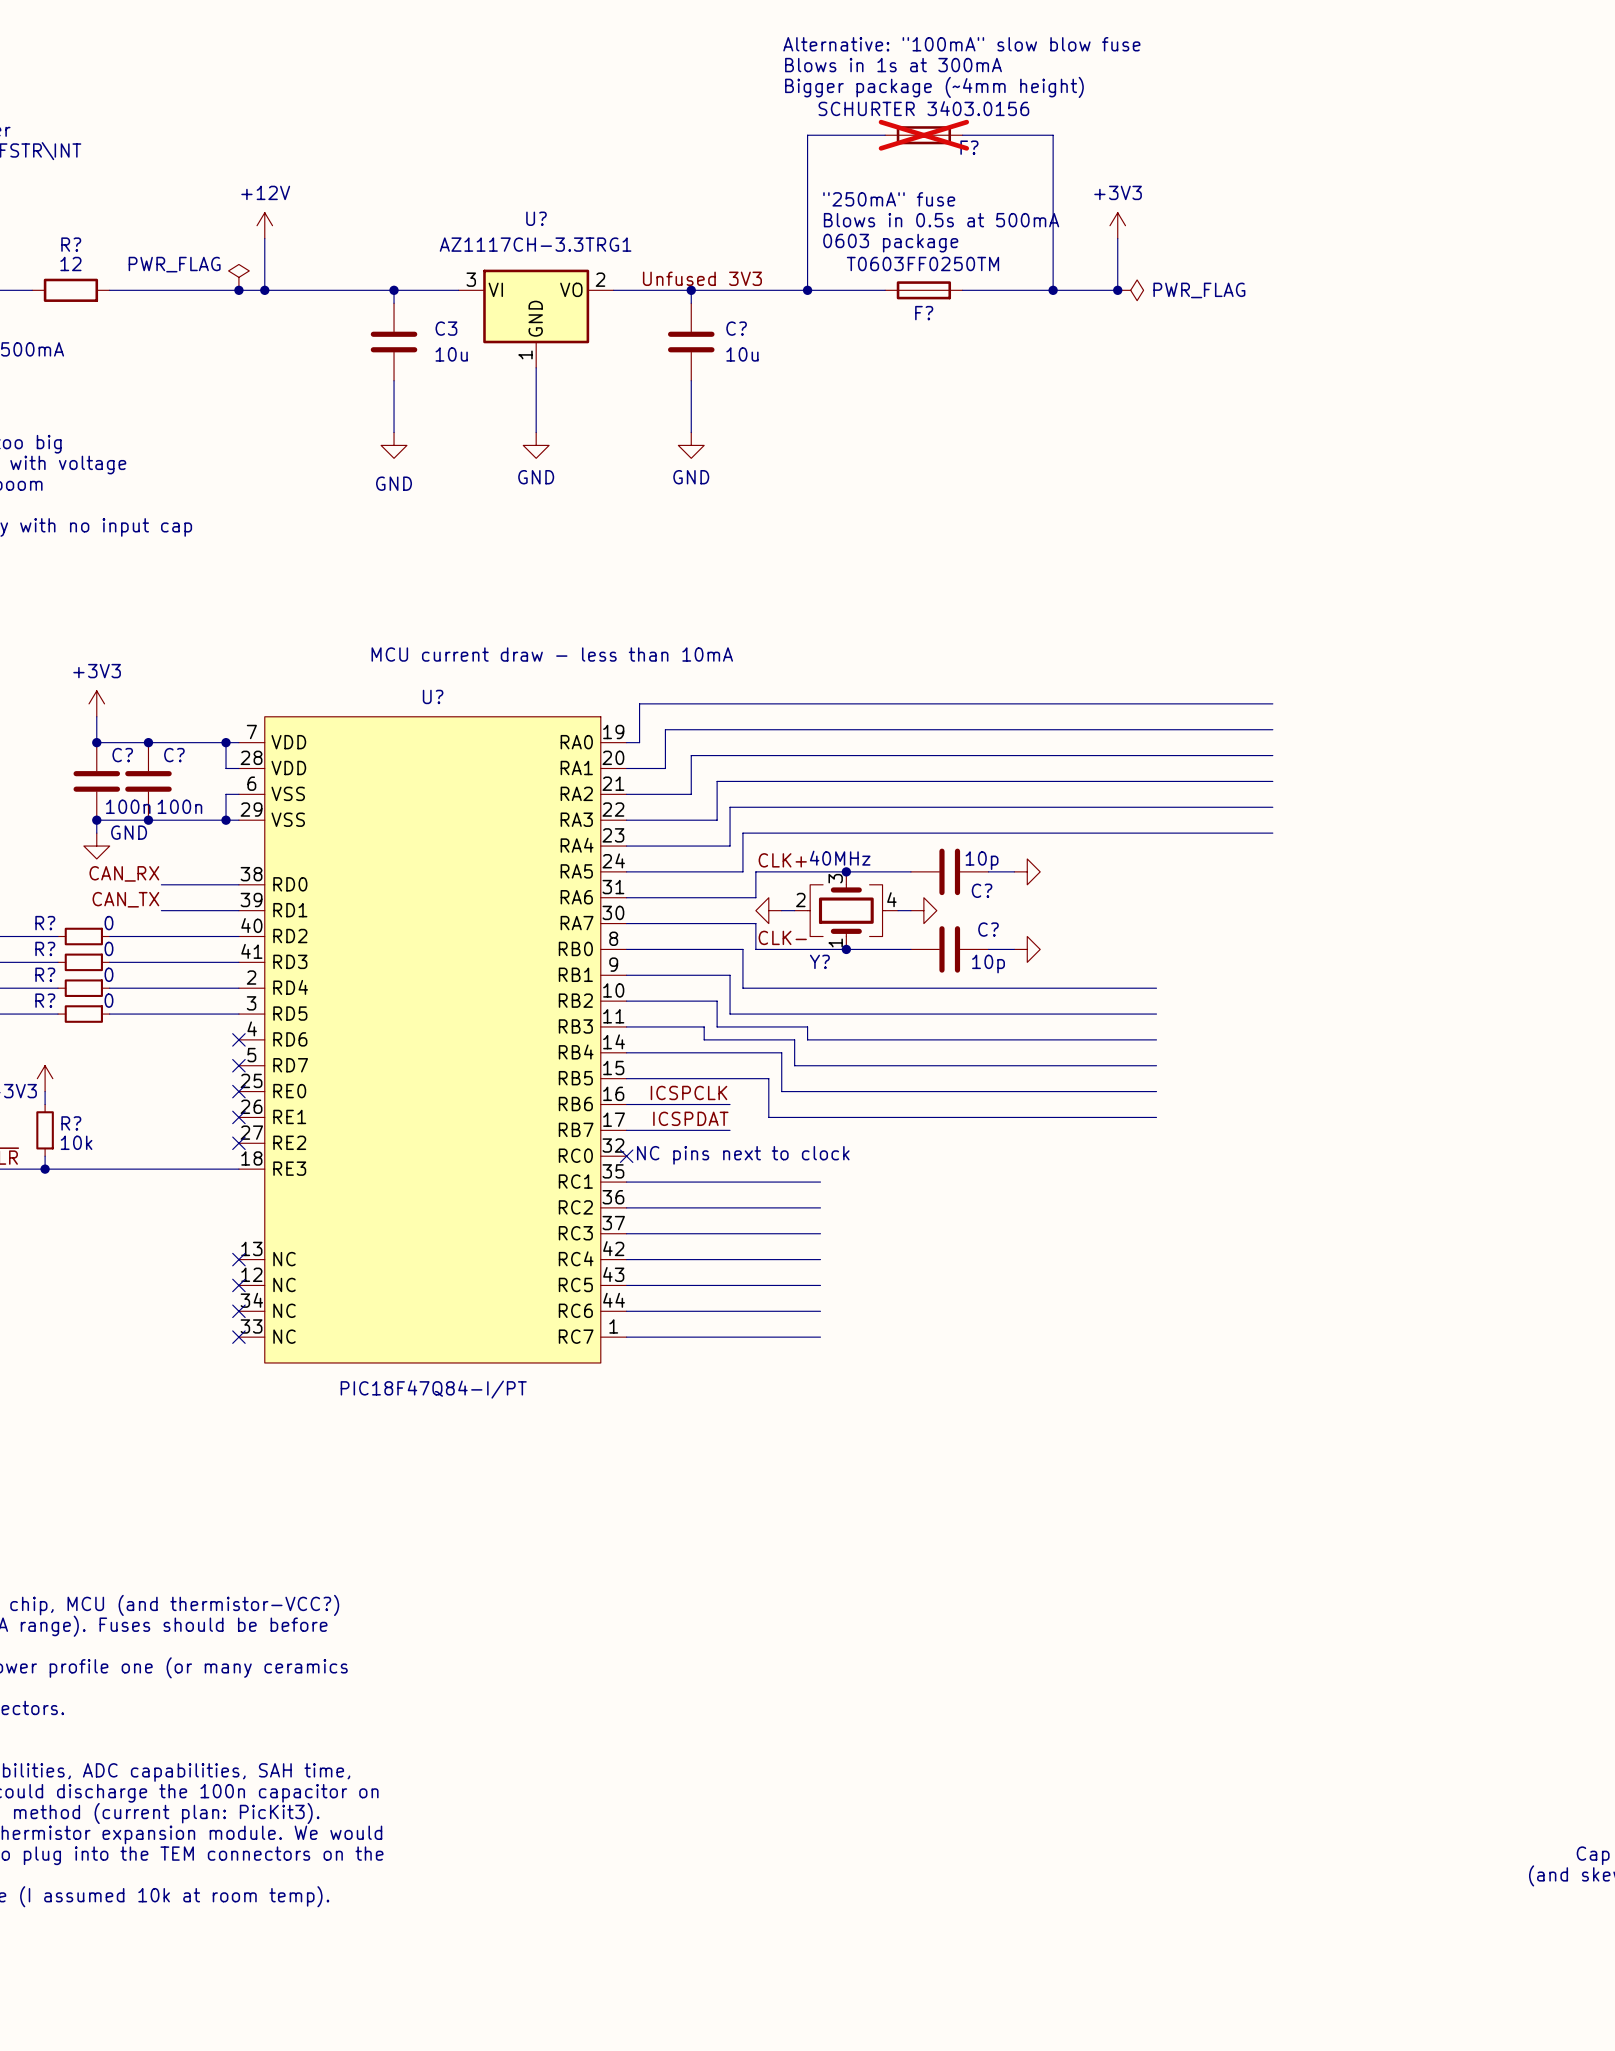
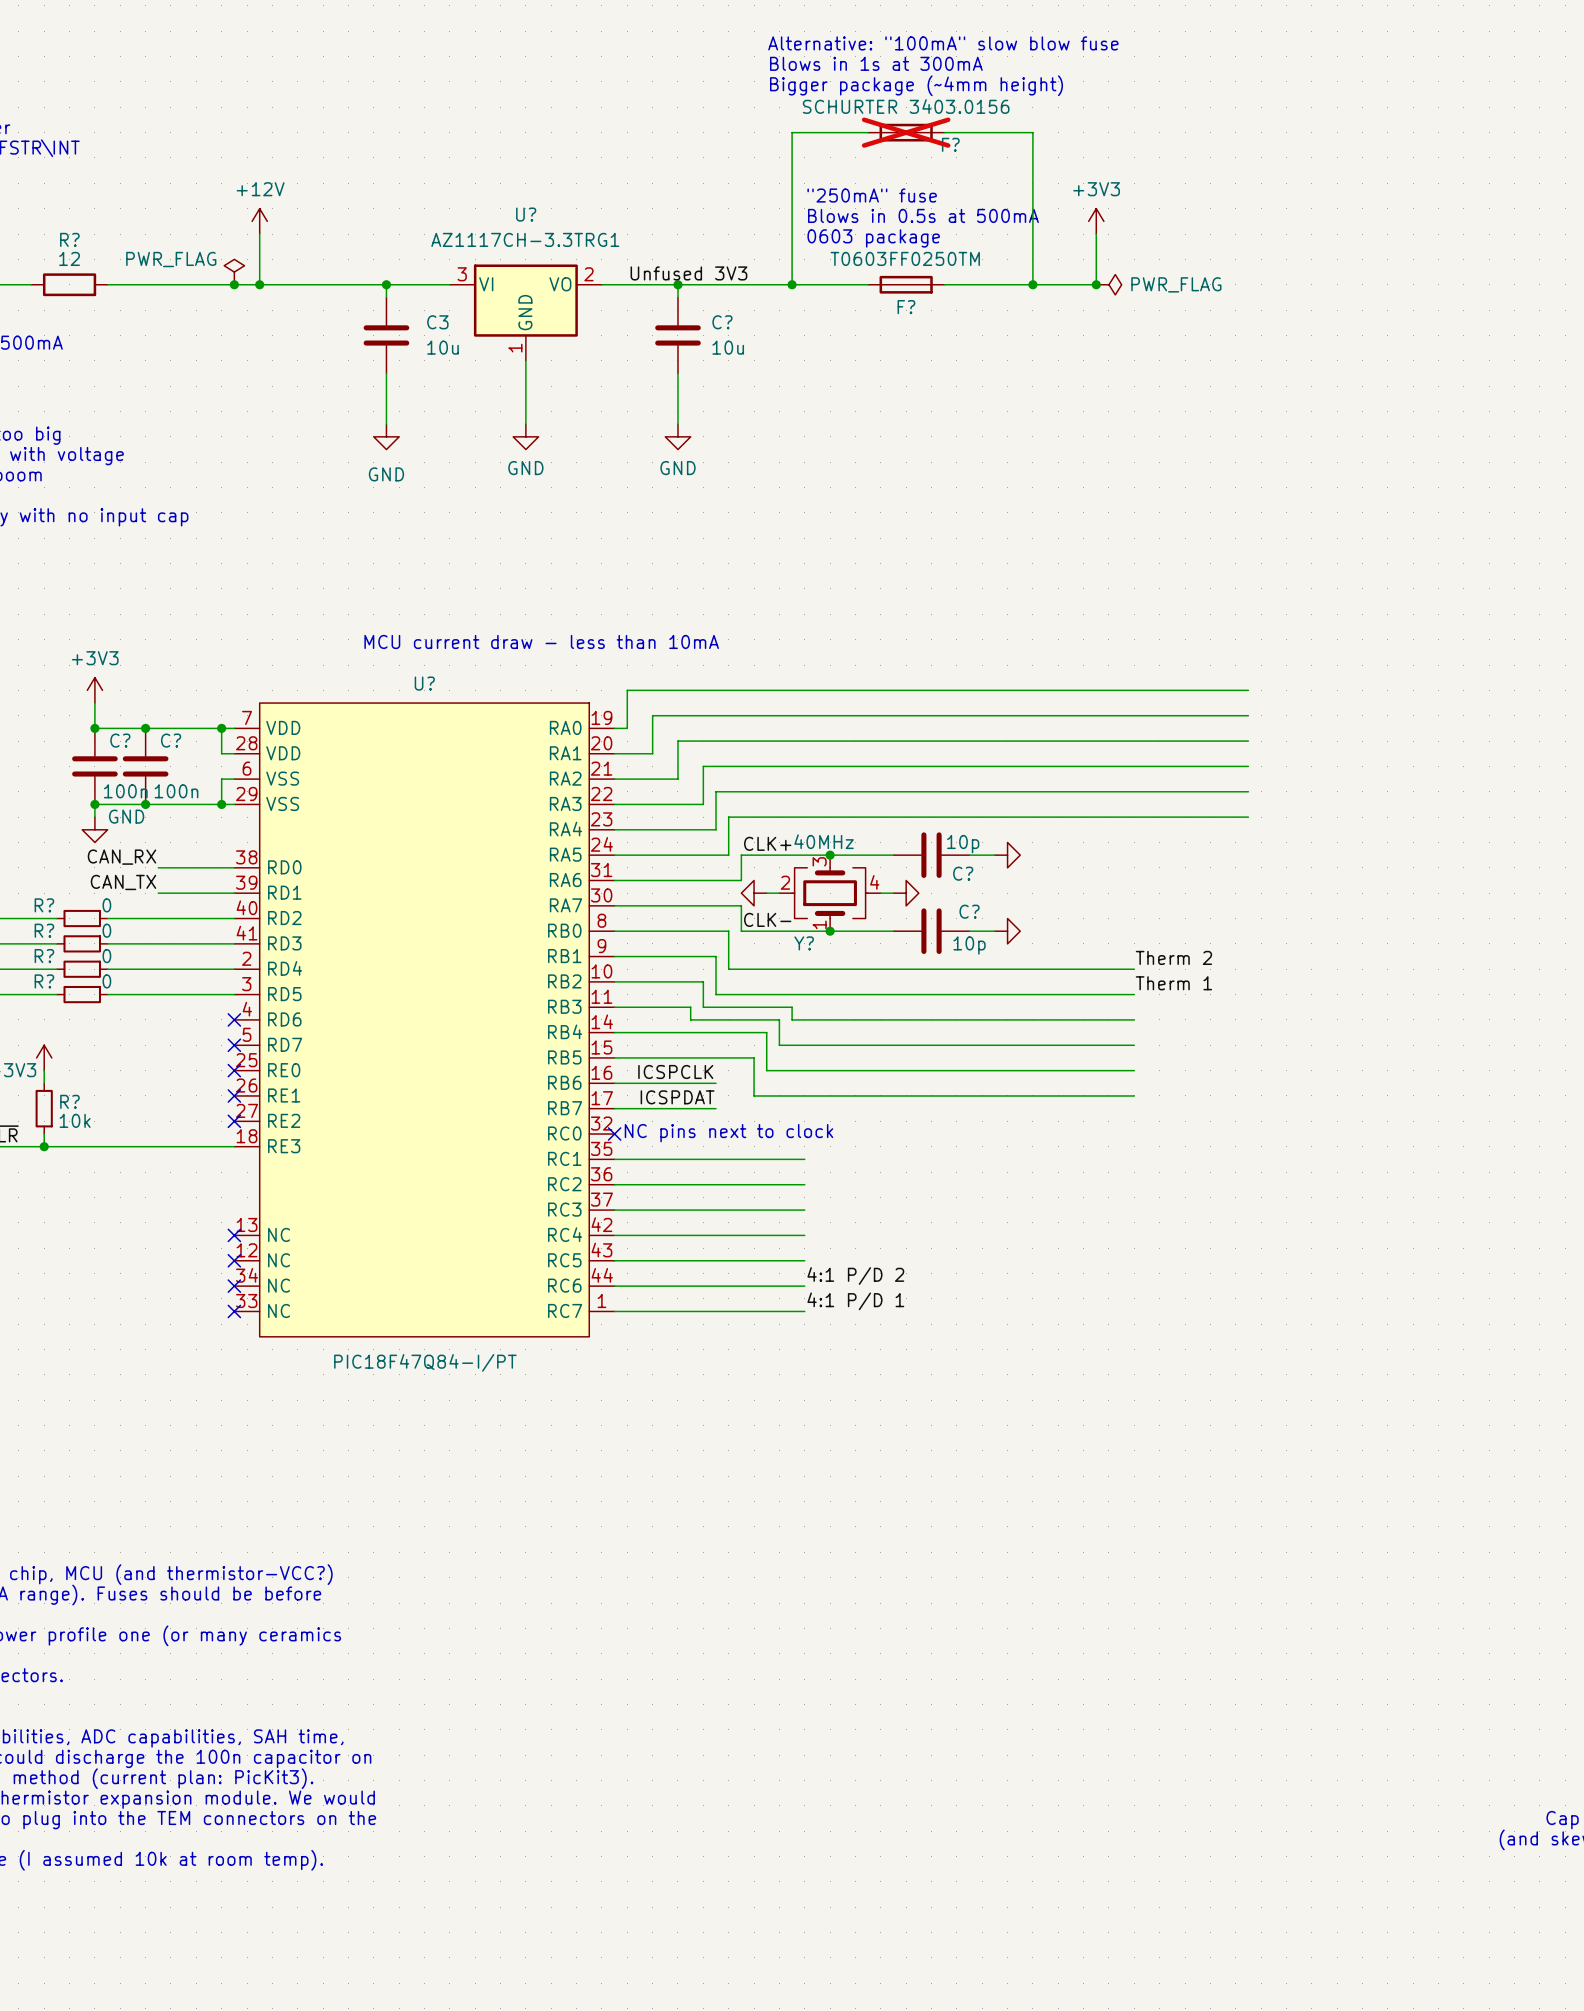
label: none -> Therm 2 (1173, 957)
label: none -> Therm 1 (1173, 983)
label: none -> 4:1 P/D 2 (855, 1276)
label: none -> 4:1 P/D 1 (855, 1301)

